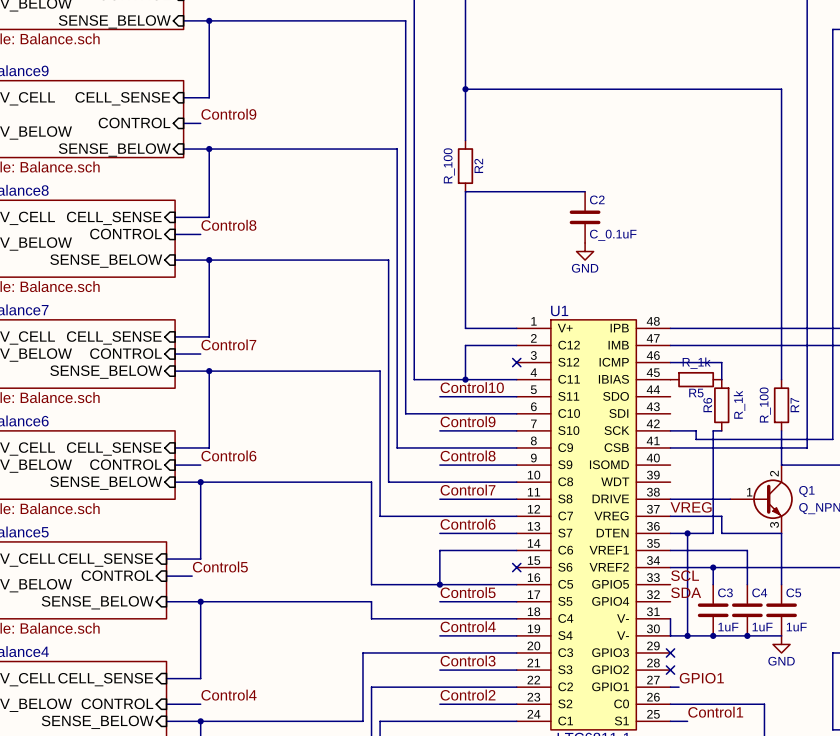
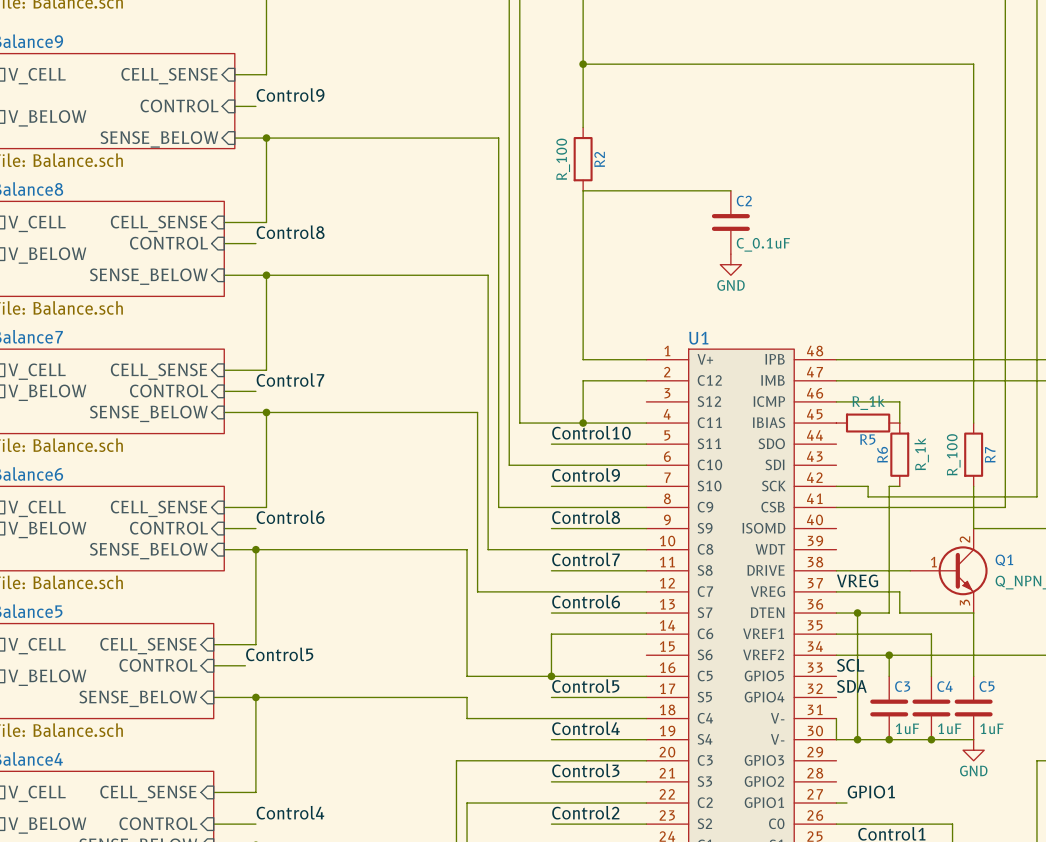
no-connect mark: (516, 362) -> none
no-connect mark: (516, 567) -> none
no-connect mark: (670, 652) -> none
no-connect mark: (670, 670) -> none

